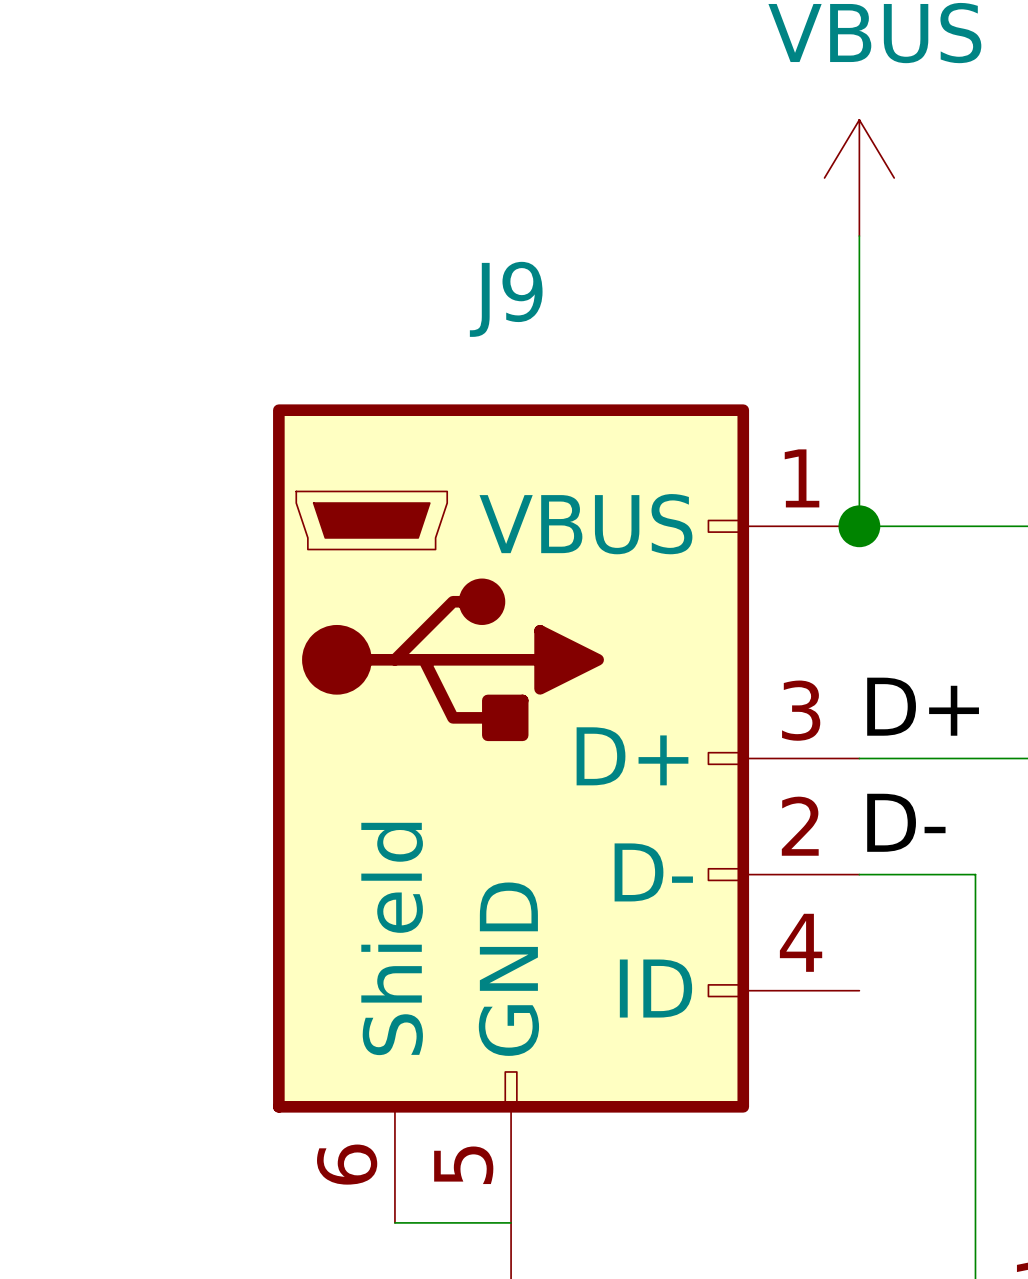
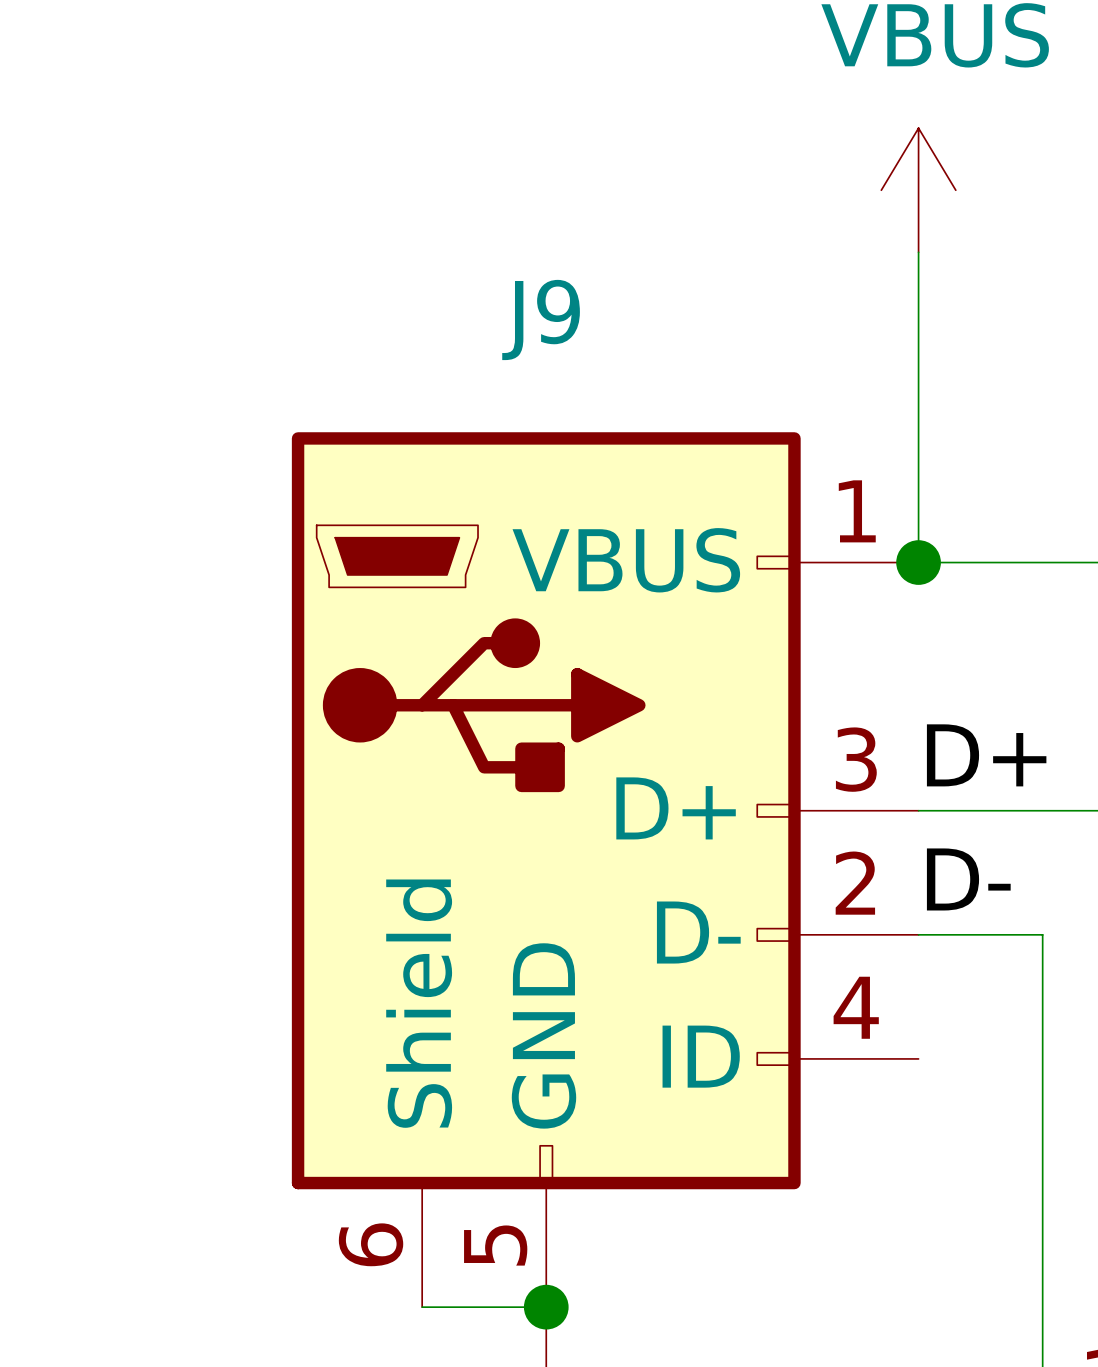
junction: none -> (546, 1307)

